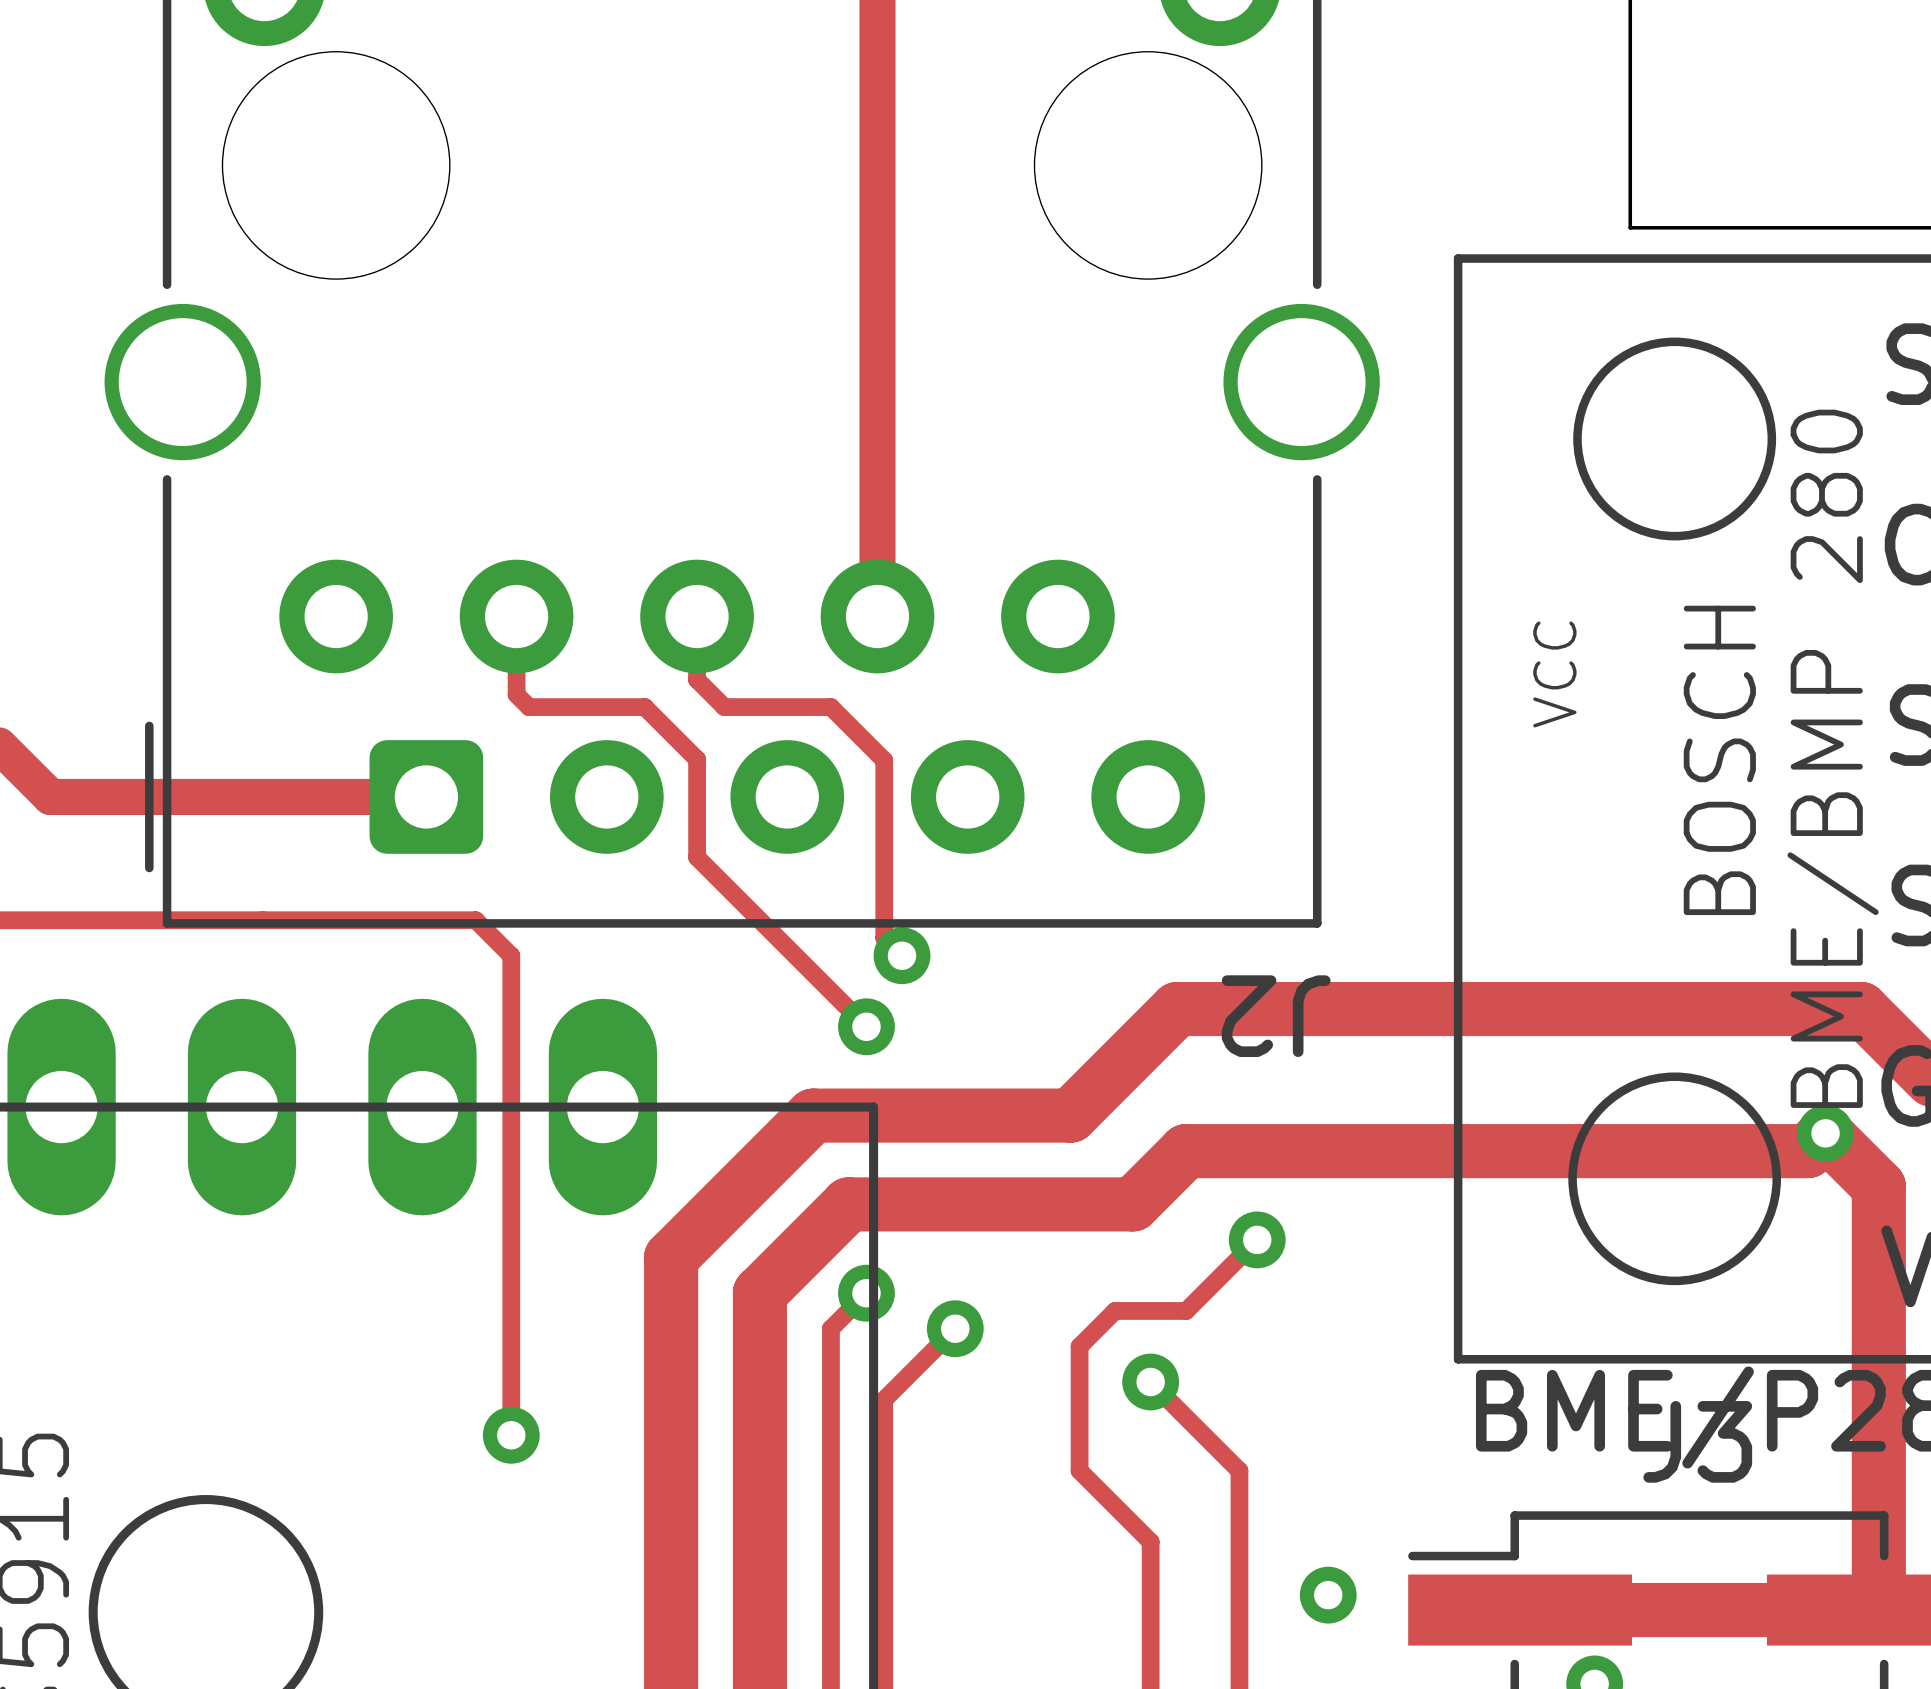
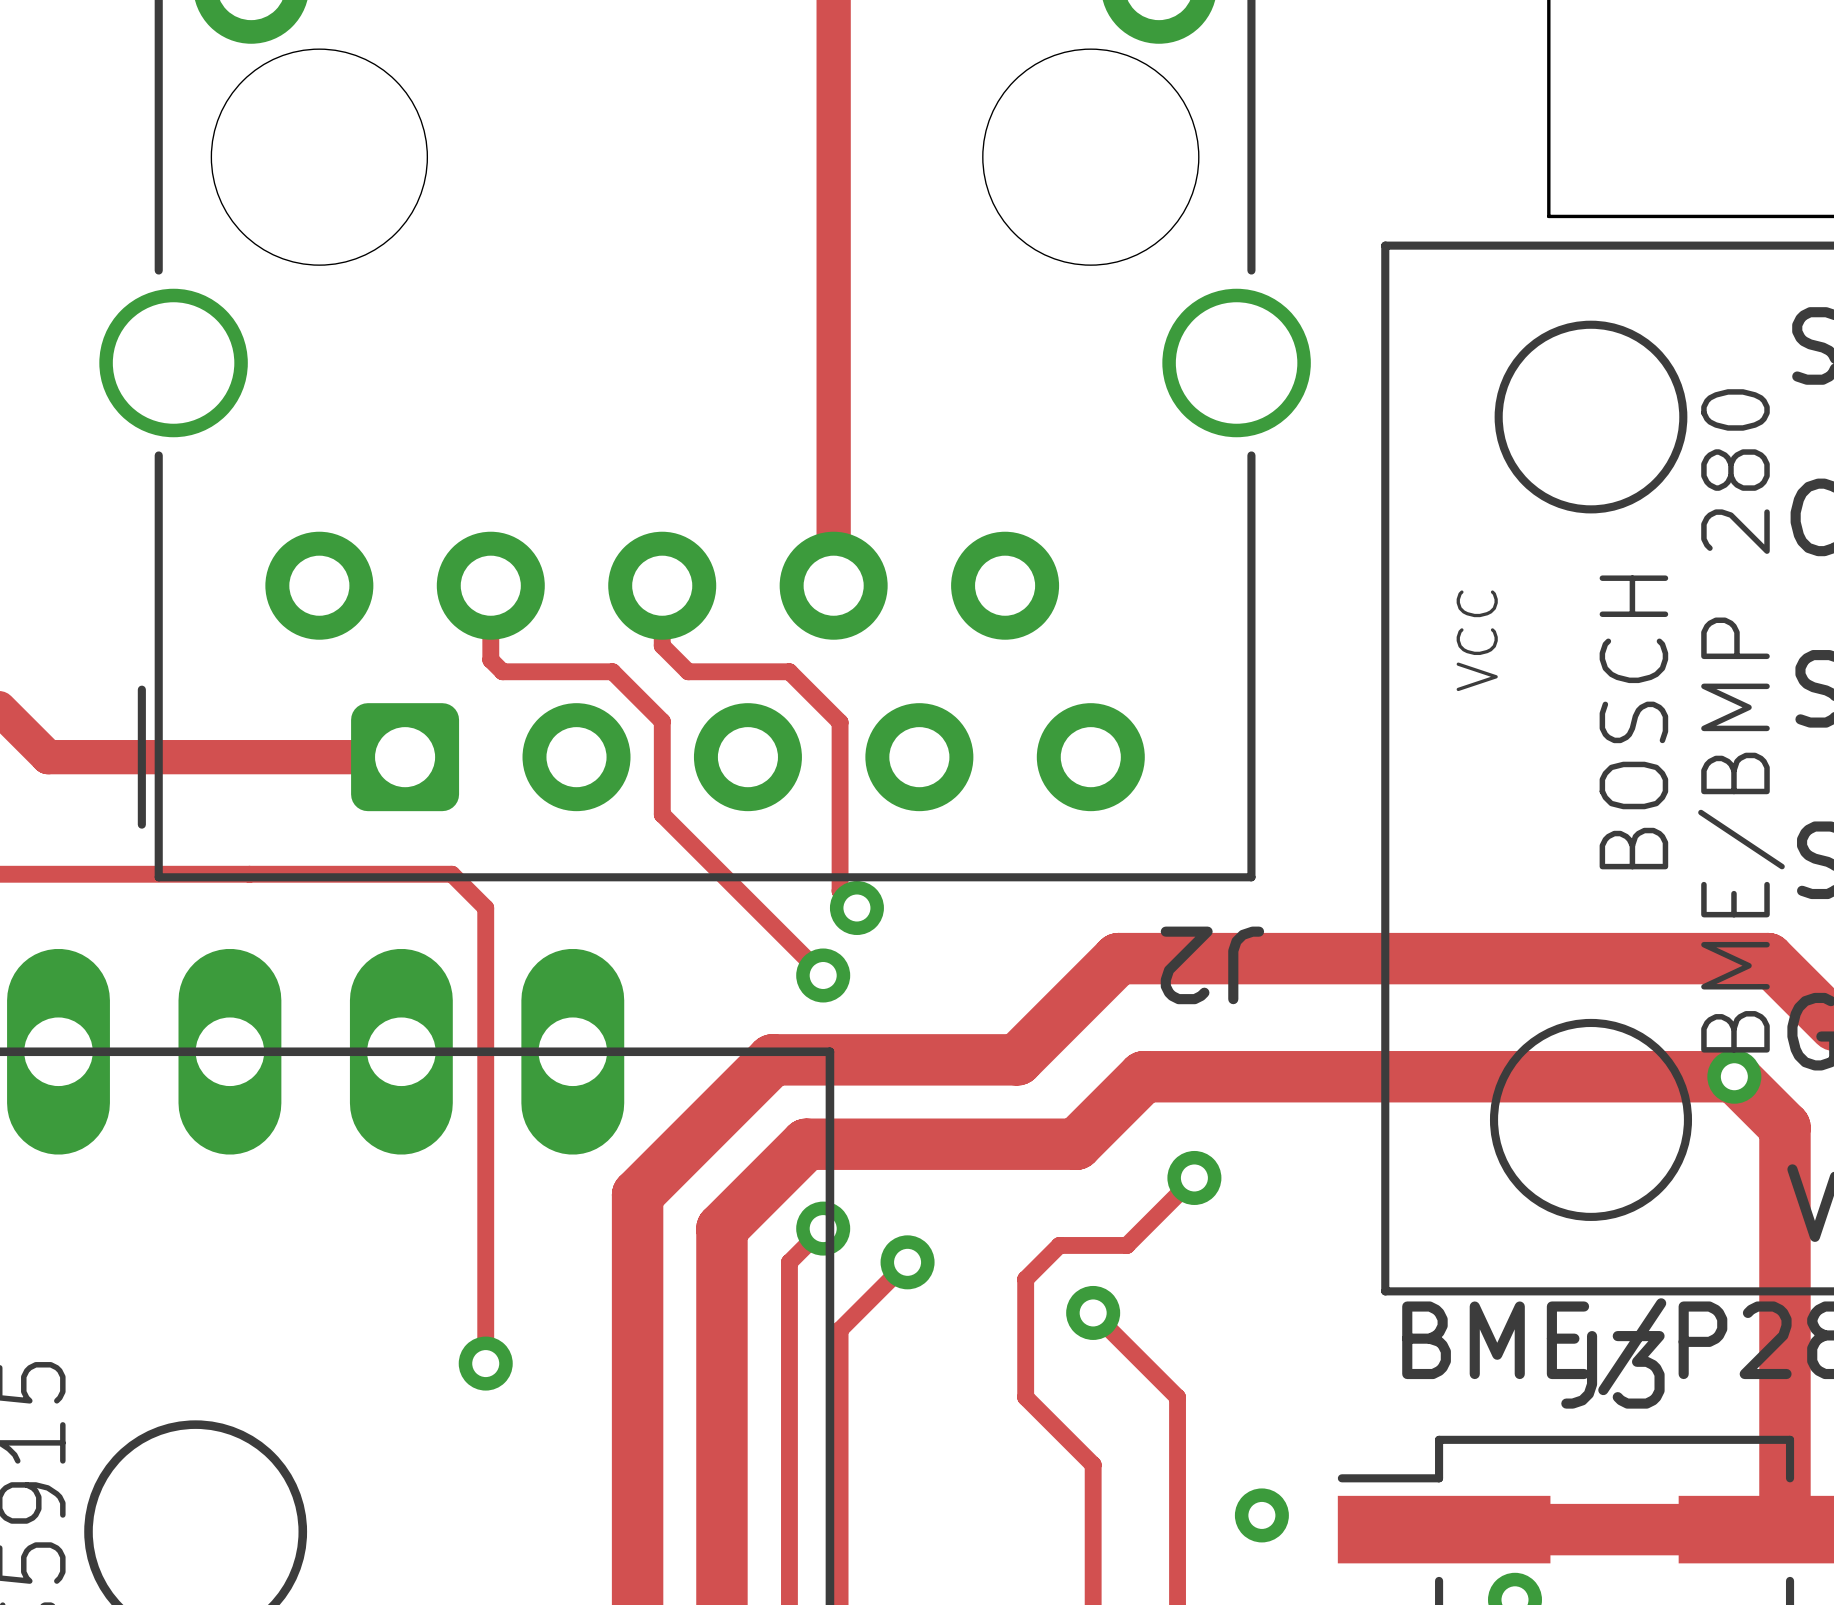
track: (1825, 1133) (1807, 1151) (1186, 1151) -> (1734, 1076) (1143, 1076) (1126, 1093)

